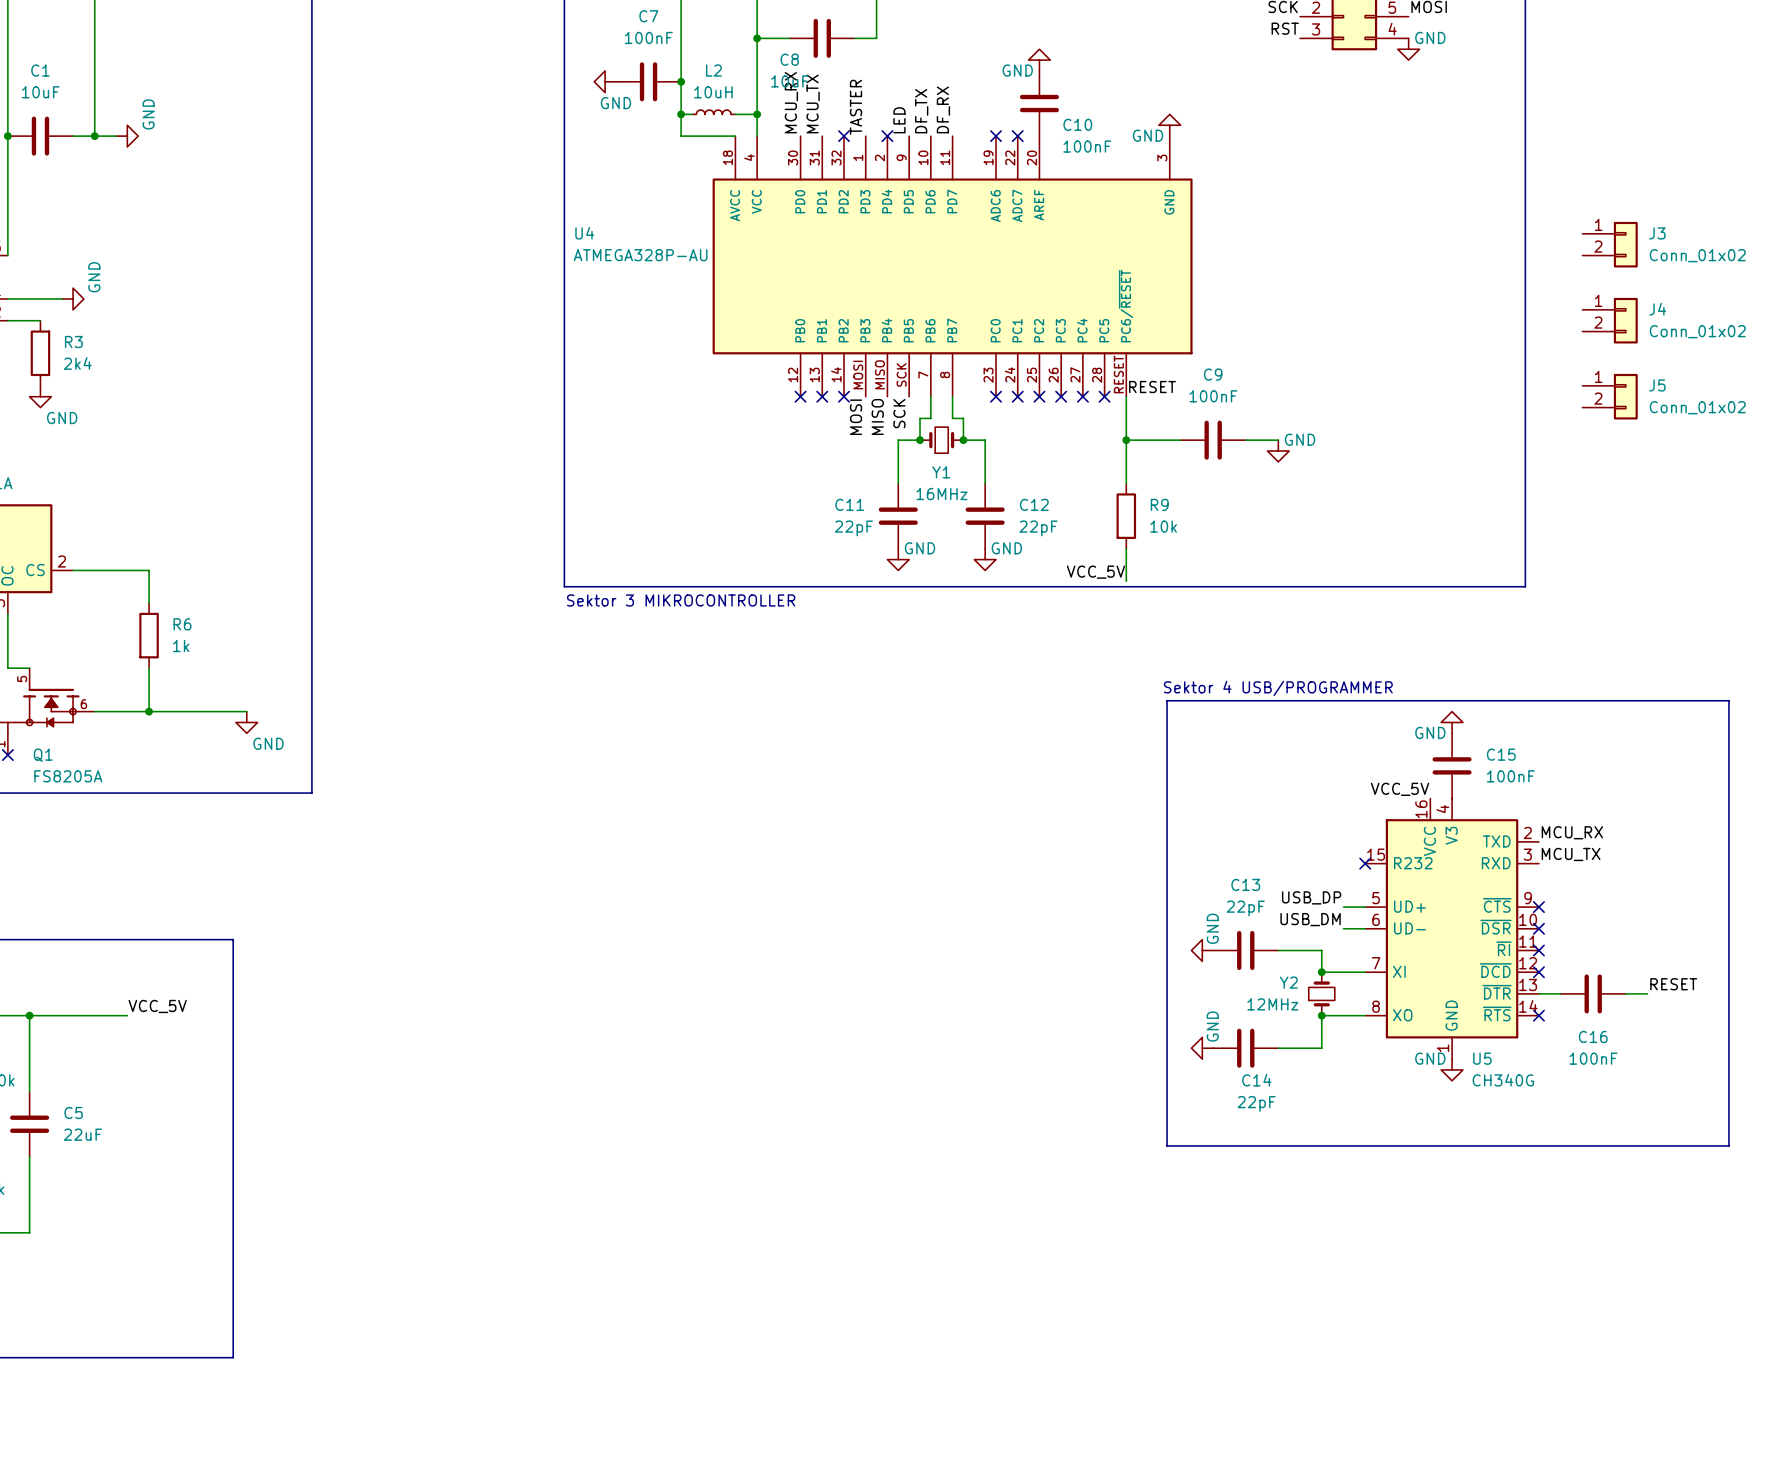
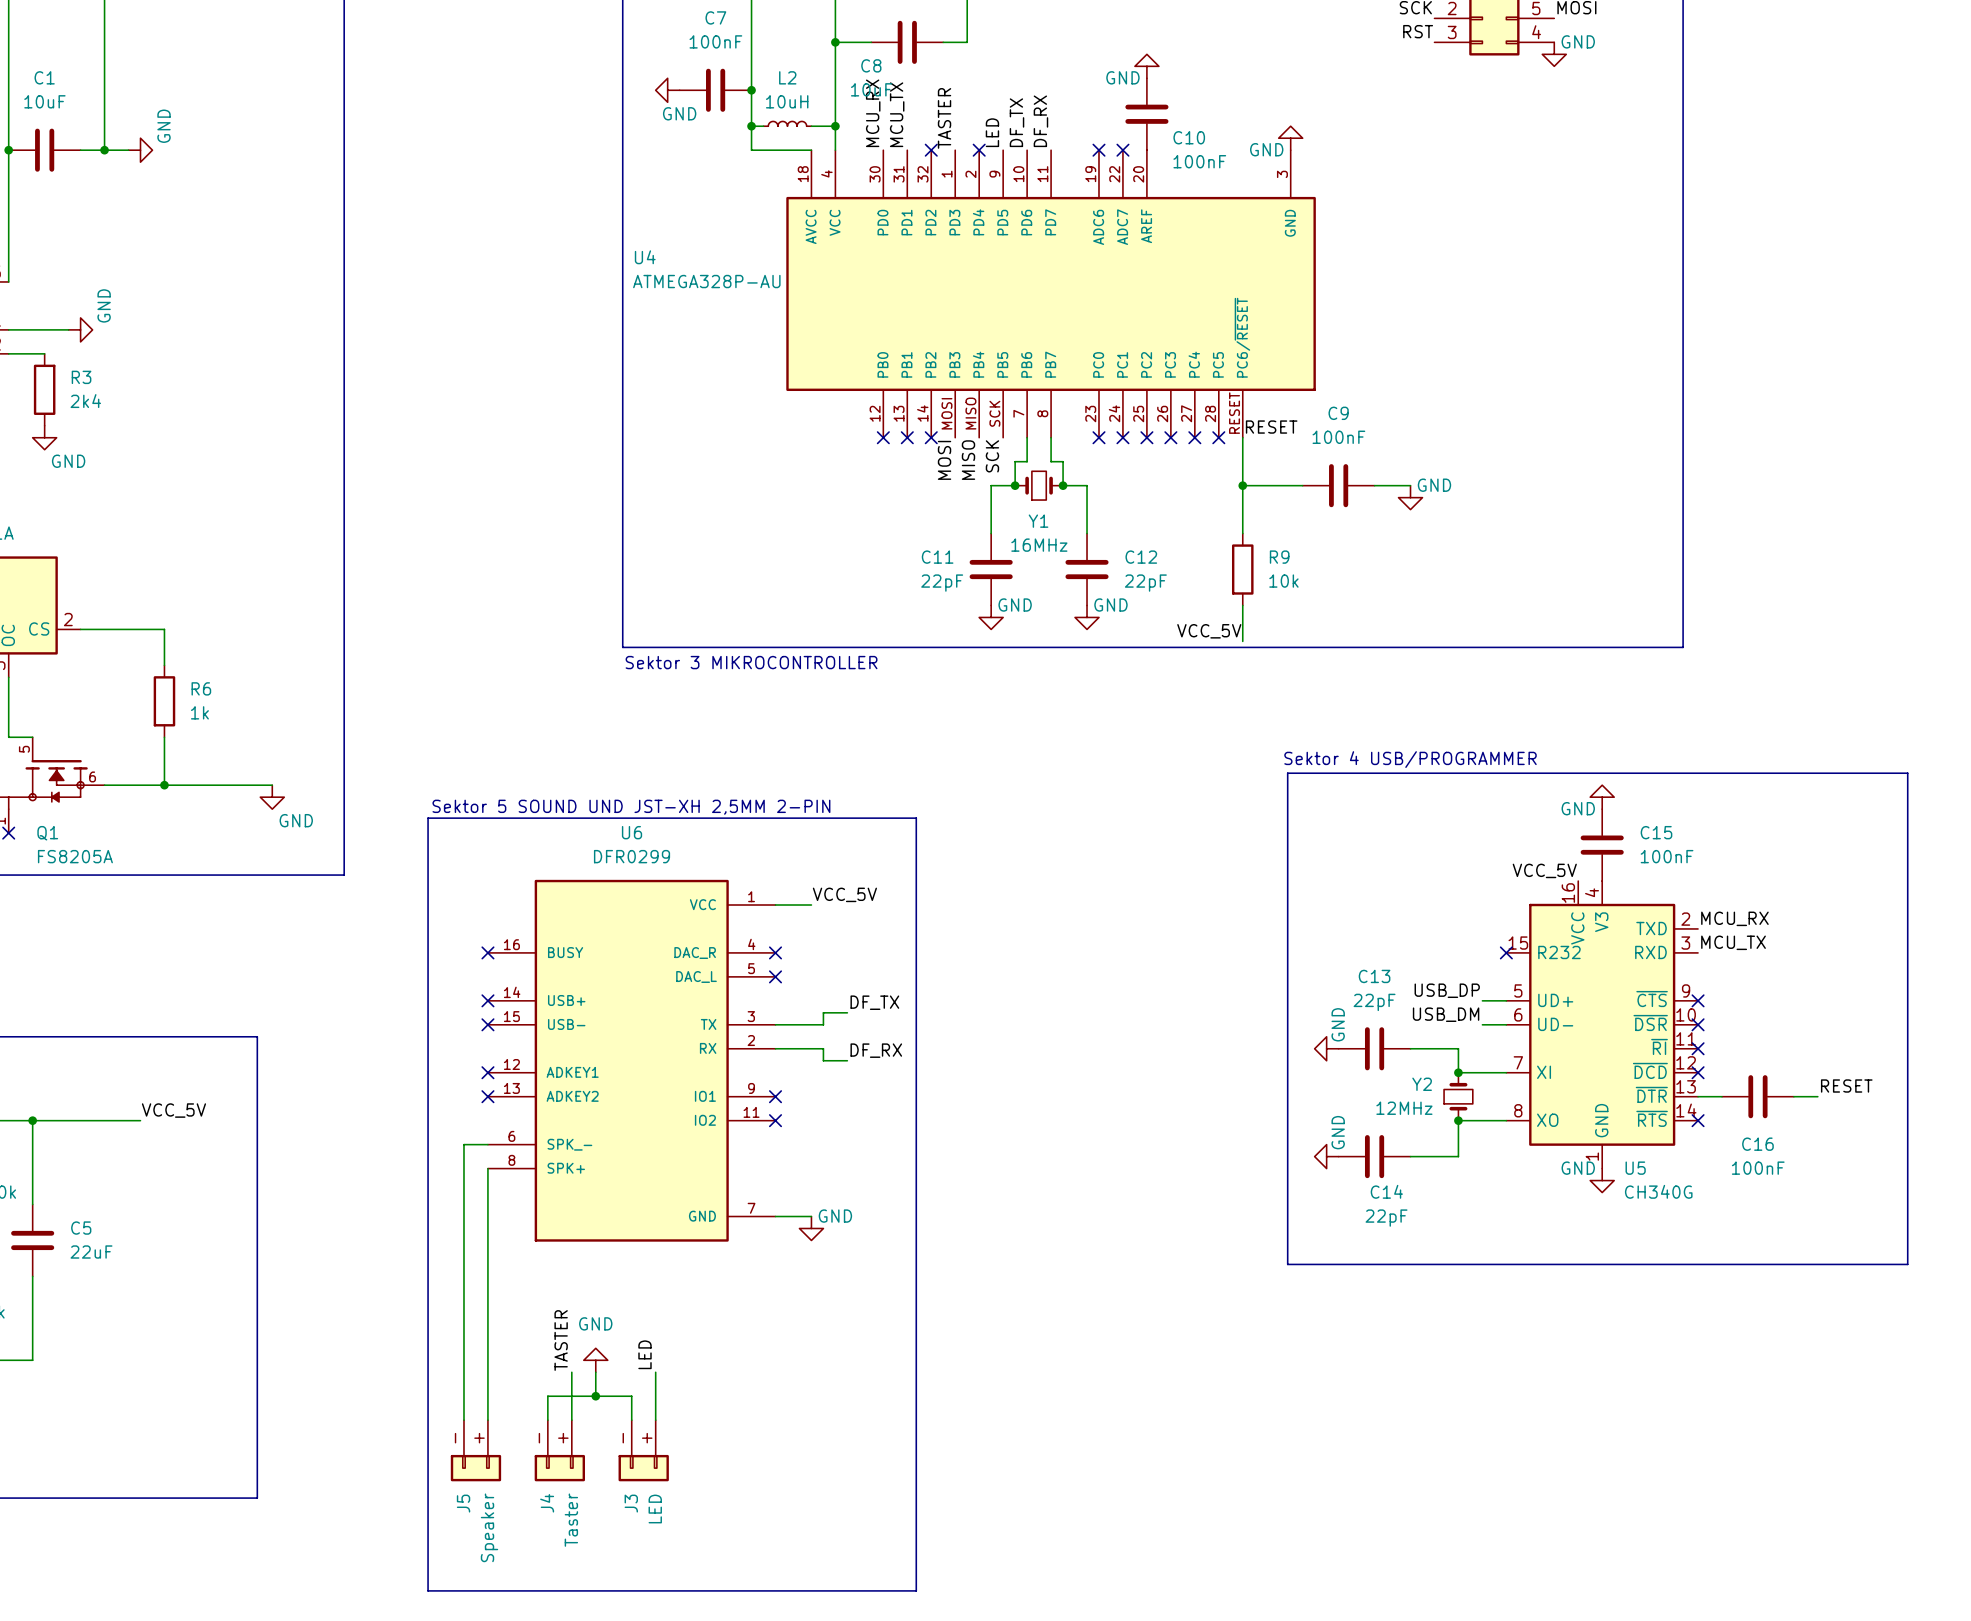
J3 symbol: [1582, 221, 1638, 268] -> [618, 1420, 669, 1482]
J3 name position: J3 (1657, 233) -> J3 (631, 1503)
J3 value: Conn_01x02 (1697, 255) -> LED (655, 1509)
J4 symbol: [1582, 297, 1638, 344] -> [534, 1420, 586, 1482]
J4 name position: J4 (1657, 309) -> J4 (547, 1503)
J4 value: Conn_01x02 (1697, 331) -> Taster (571, 1520)
J5 symbol: [1582, 373, 1638, 420] -> [450, 1420, 502, 1482]
J5 name position: J5 (1657, 385) -> J5 (463, 1503)
J5 value: Conn_01x02 (1697, 407) -> Speaker (489, 1527)
text: none -> Sektor 5 SOUND UND JST-XH 2,5MM 2-PIN (631, 807)
line: none -> (428, 818) (916, 818) (916, 1590) (428, 1590) (428, 818)
label: none -> VCC_5V (844, 894)
wire: none -> (775, 905) (811, 905)
no-connect mark: none -> (487, 952)
no-connect mark: none -> (775, 952)
no-connect mark: none -> (775, 976)
no-connect mark: none -> (487, 1000)
label: none -> DF_TX (874, 1002)
wire: none -> (847, 1012) (823, 1012) (823, 1024) (775, 1024)
no-connect mark: none -> (487, 1024)
wire: none -> (775, 1048) (823, 1048) (823, 1060) (847, 1060)
label: none -> DF_RX (876, 1050)
U6: none -> DFR0299 (631, 1060)
no-connect mark: none -> (487, 1072)
no-connect mark: none -> (487, 1096)
no-connect mark: none -> (775, 1096)
no-connect mark: none -> (775, 1120)
wire: none -> (487, 1144) (463, 1144) (463, 1420)
wire: none -> (487, 1168) (487, 1420)
wire: none -> (775, 1216) (811, 1216)
power symbol: none -> GND (811, 1228)
label: none -> TASTER (561, 1340)
label: none -> LED (644, 1354)
power symbol: none -> GND (595, 1360)
wire: none -> (571, 1372) (571, 1420)
wire: none -> (595, 1372) (595, 1396)
wire: none -> (655, 1372) (655, 1420)
junction: none -> (595, 1396)
wire: none -> (547, 1420) (547, 1396) (631, 1396) (631, 1420)

